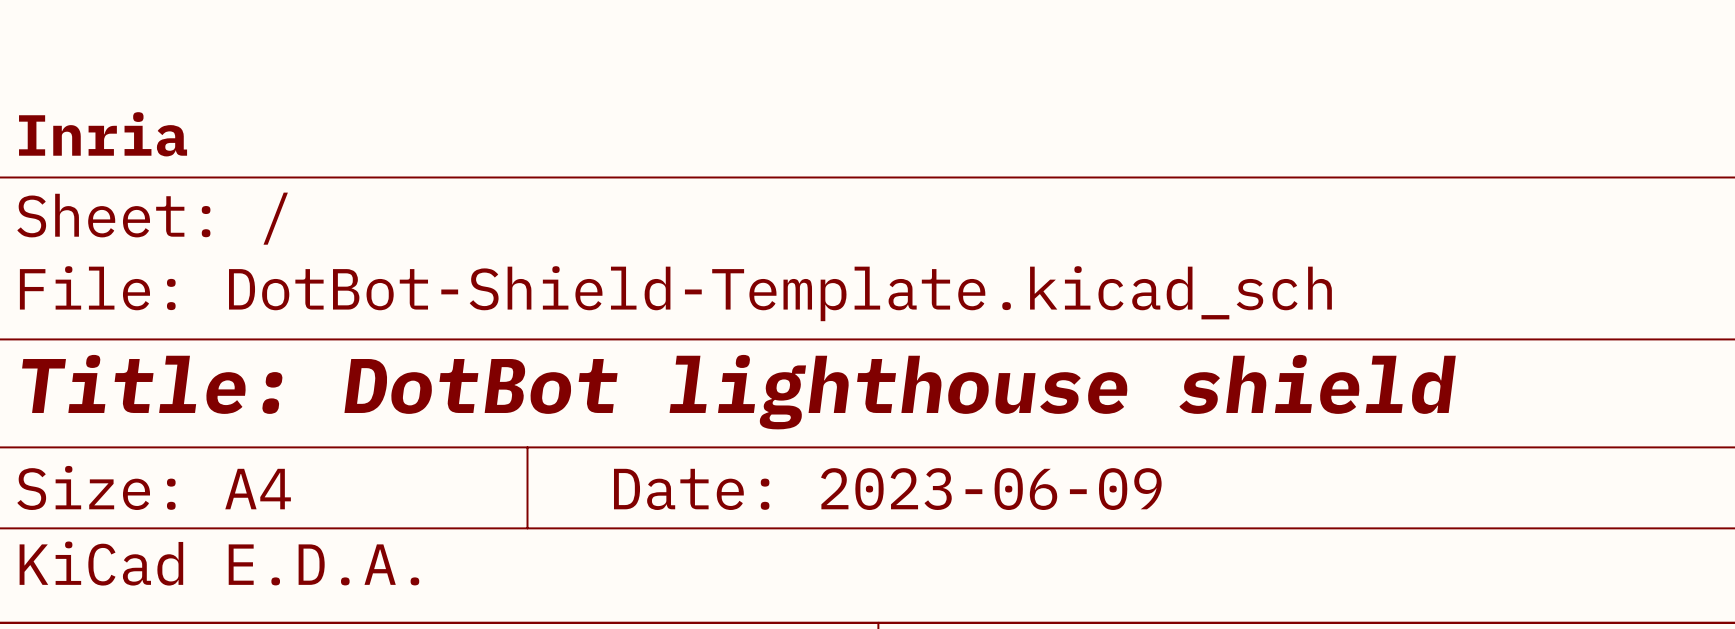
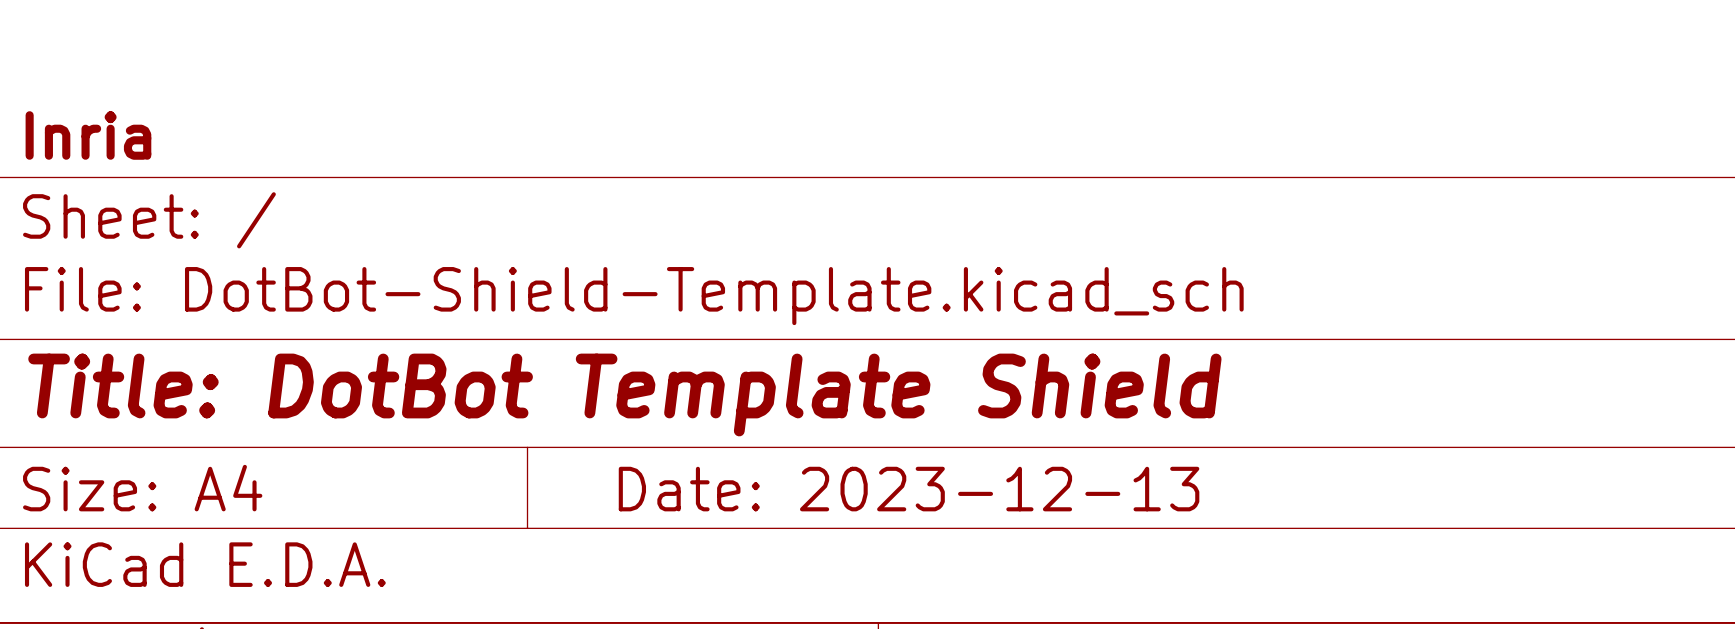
title block: Title: DotBot lighthouse shield (738, 392) -> Title: DotBot Template Shield (624, 394)
title block: Date: 2023-06-09 (887, 489) -> Date: 2023-12-13 (909, 489)

